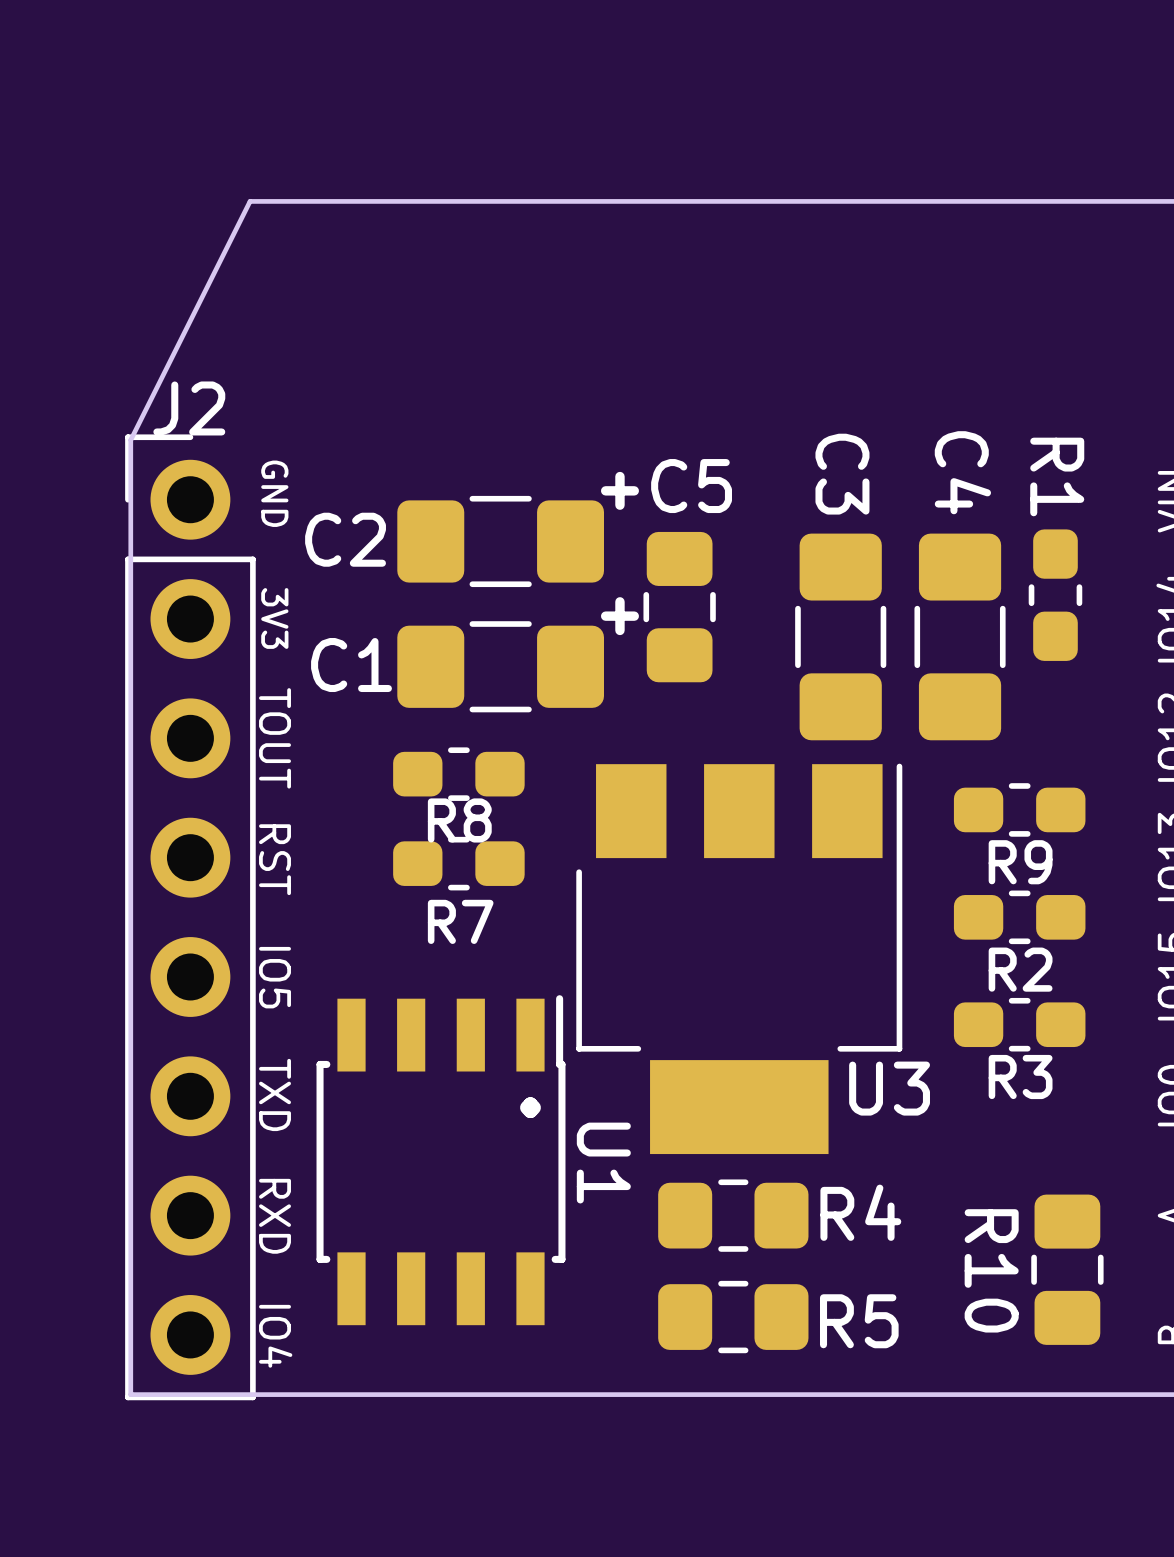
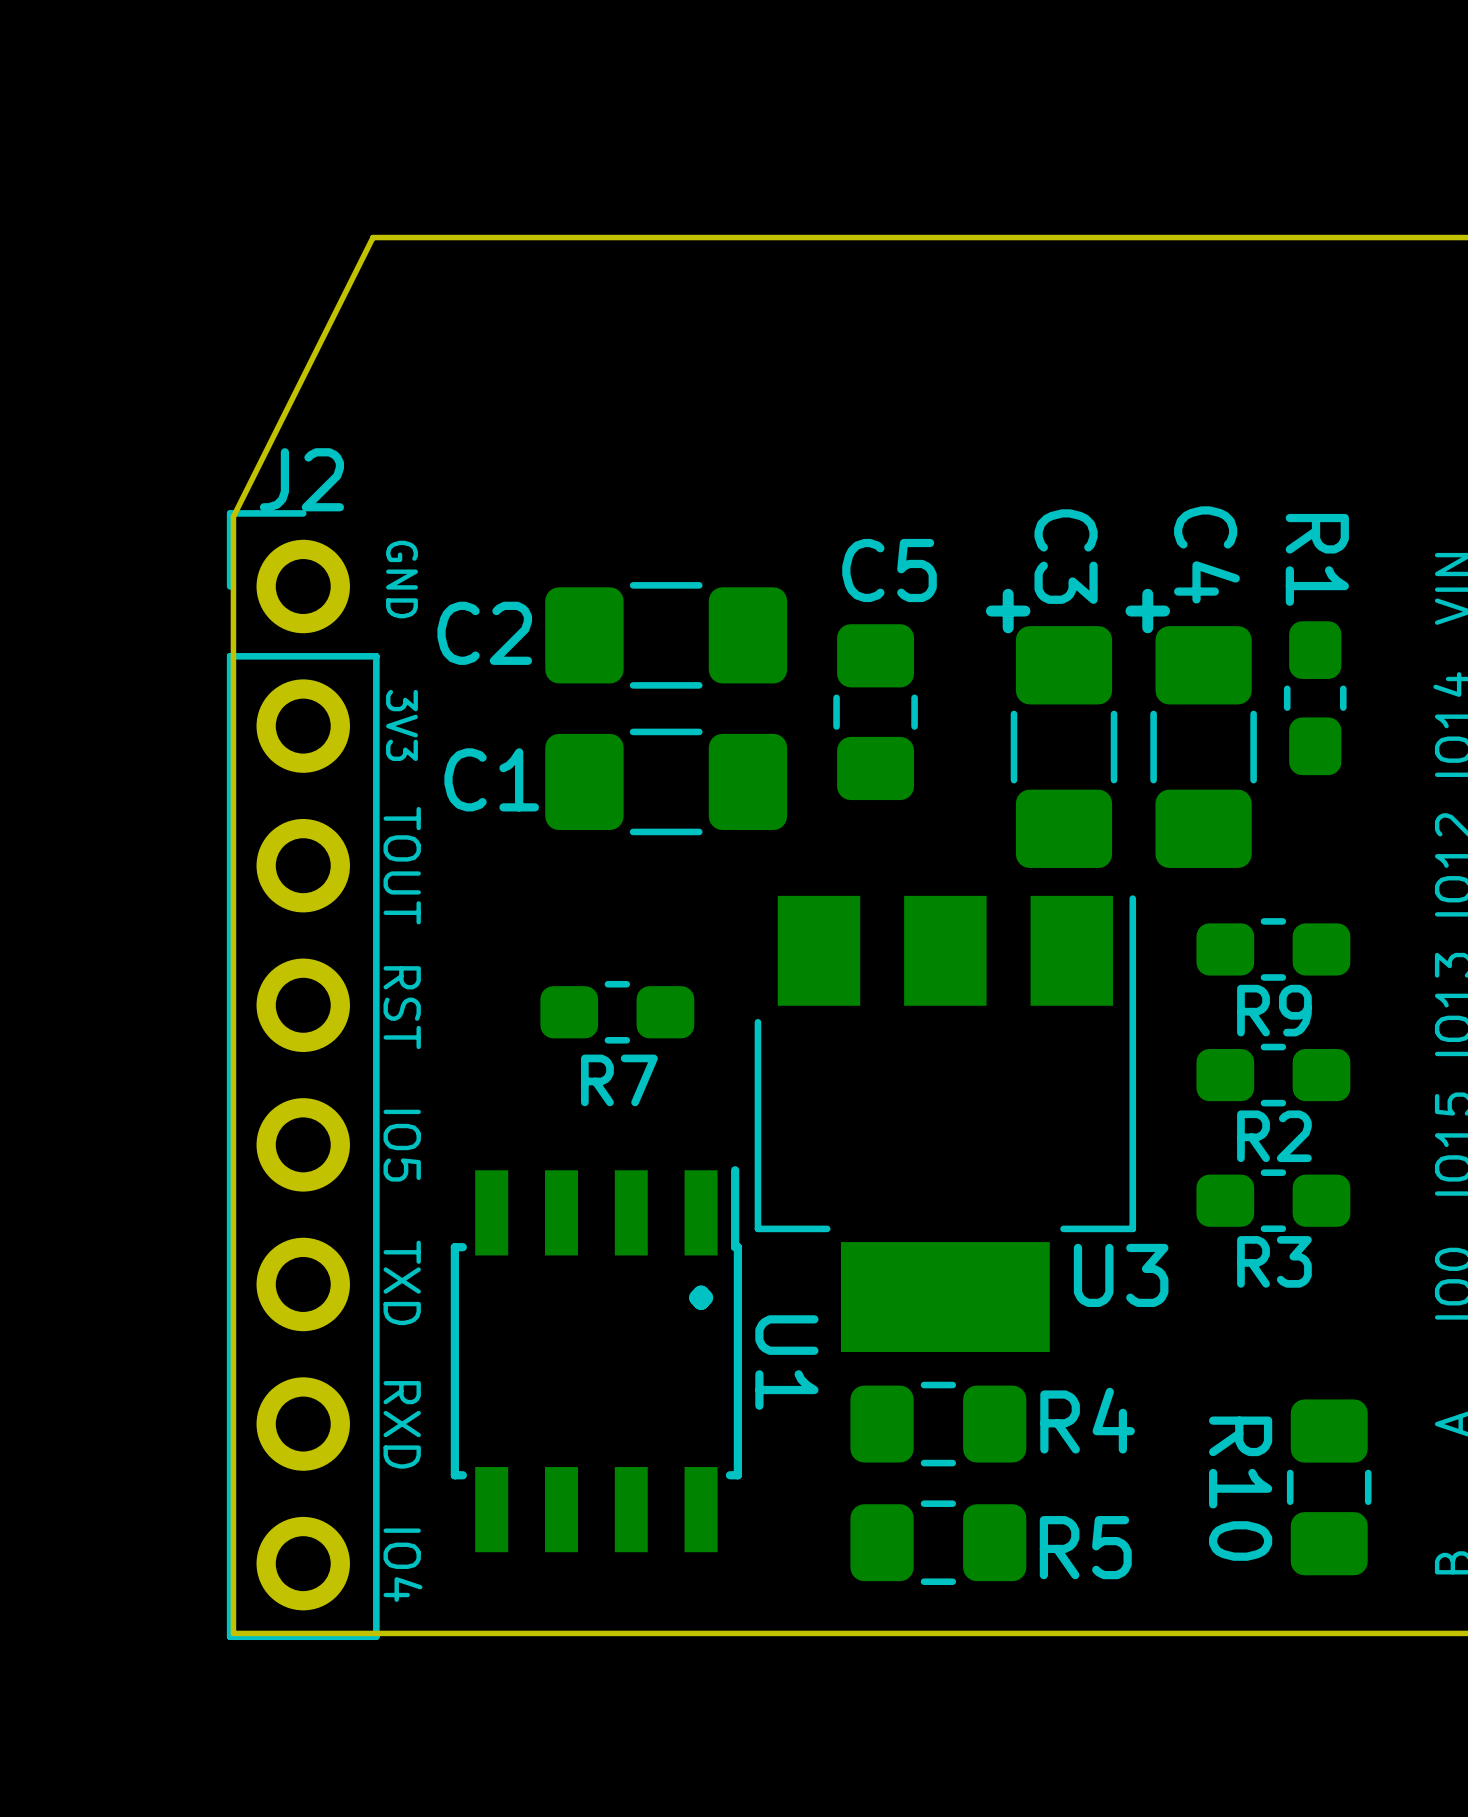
text: + (619, 490) -> none
text: none -> + (1008, 611)
text: none -> + (1147, 611)
text: + (619, 616) -> none
R8: (458, 774) -> none

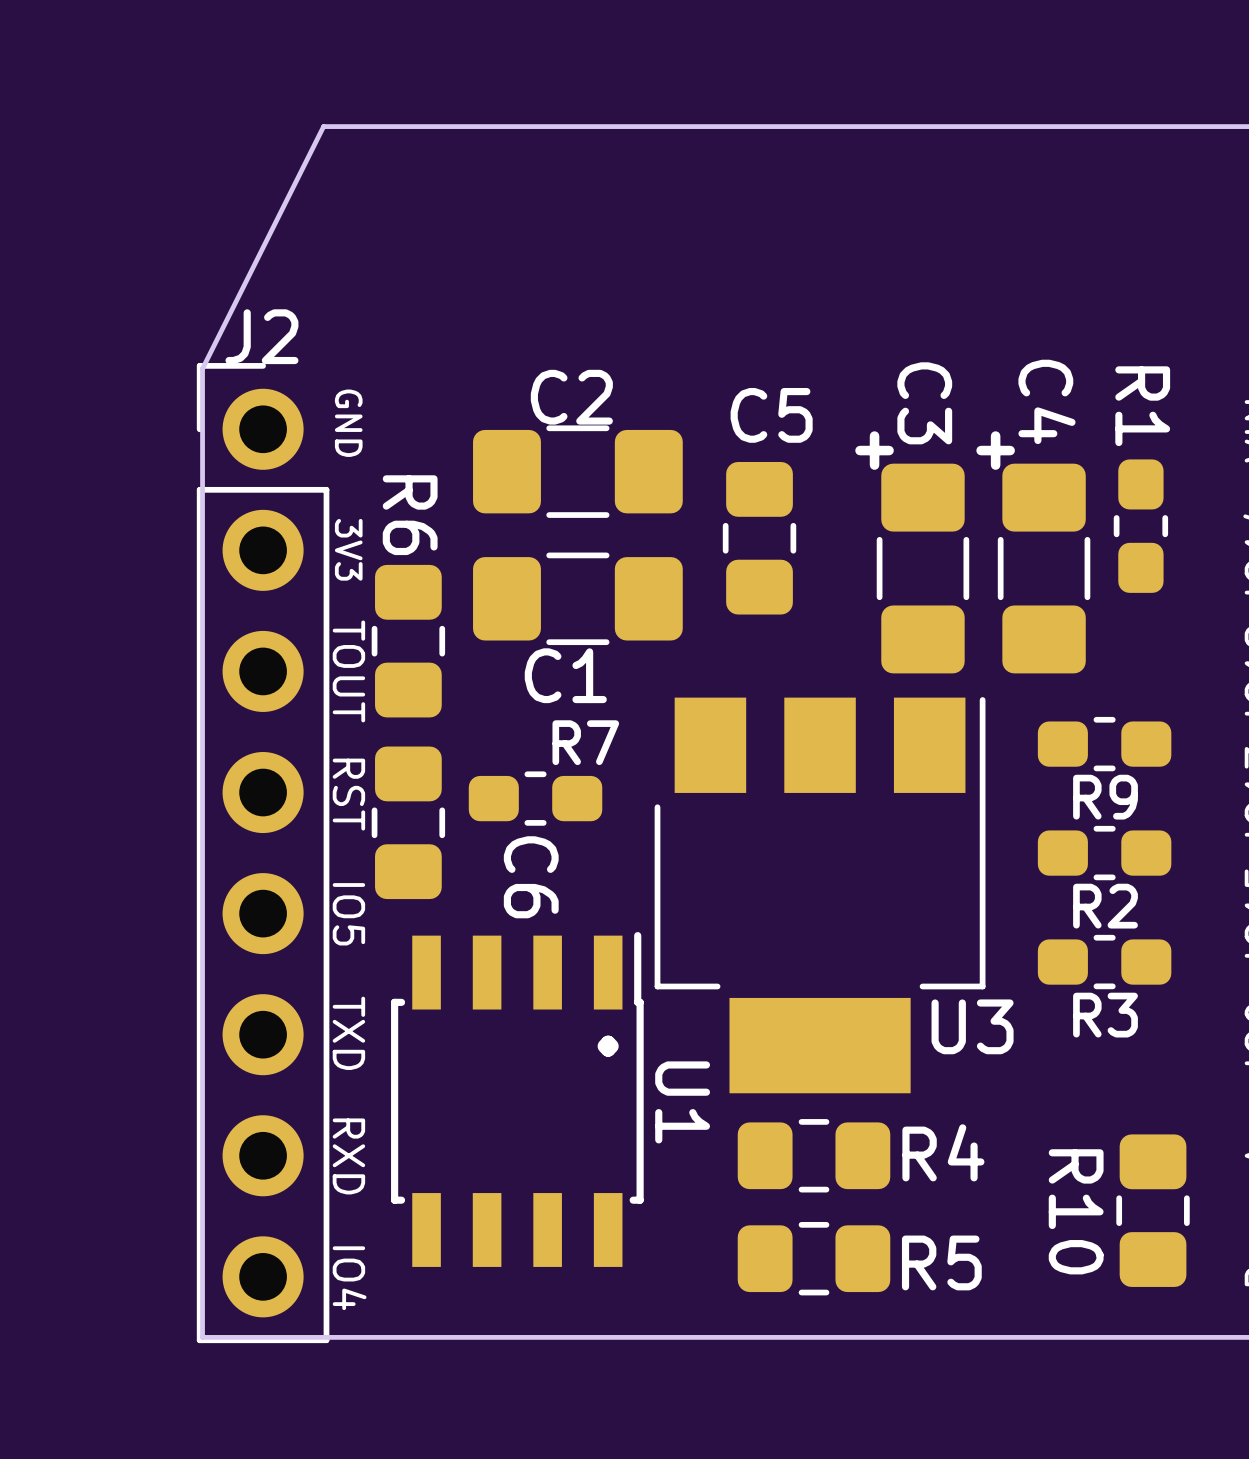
C2 name position: C2 (484, 633) -> C2 (571, 397)
C1 name position: C1 (491, 779) -> C1 (565, 675)
R6: none -> (408, 641)
C6: none -> (408, 822)
R7 name position: R7 (619, 1080) -> R7 (585, 742)

